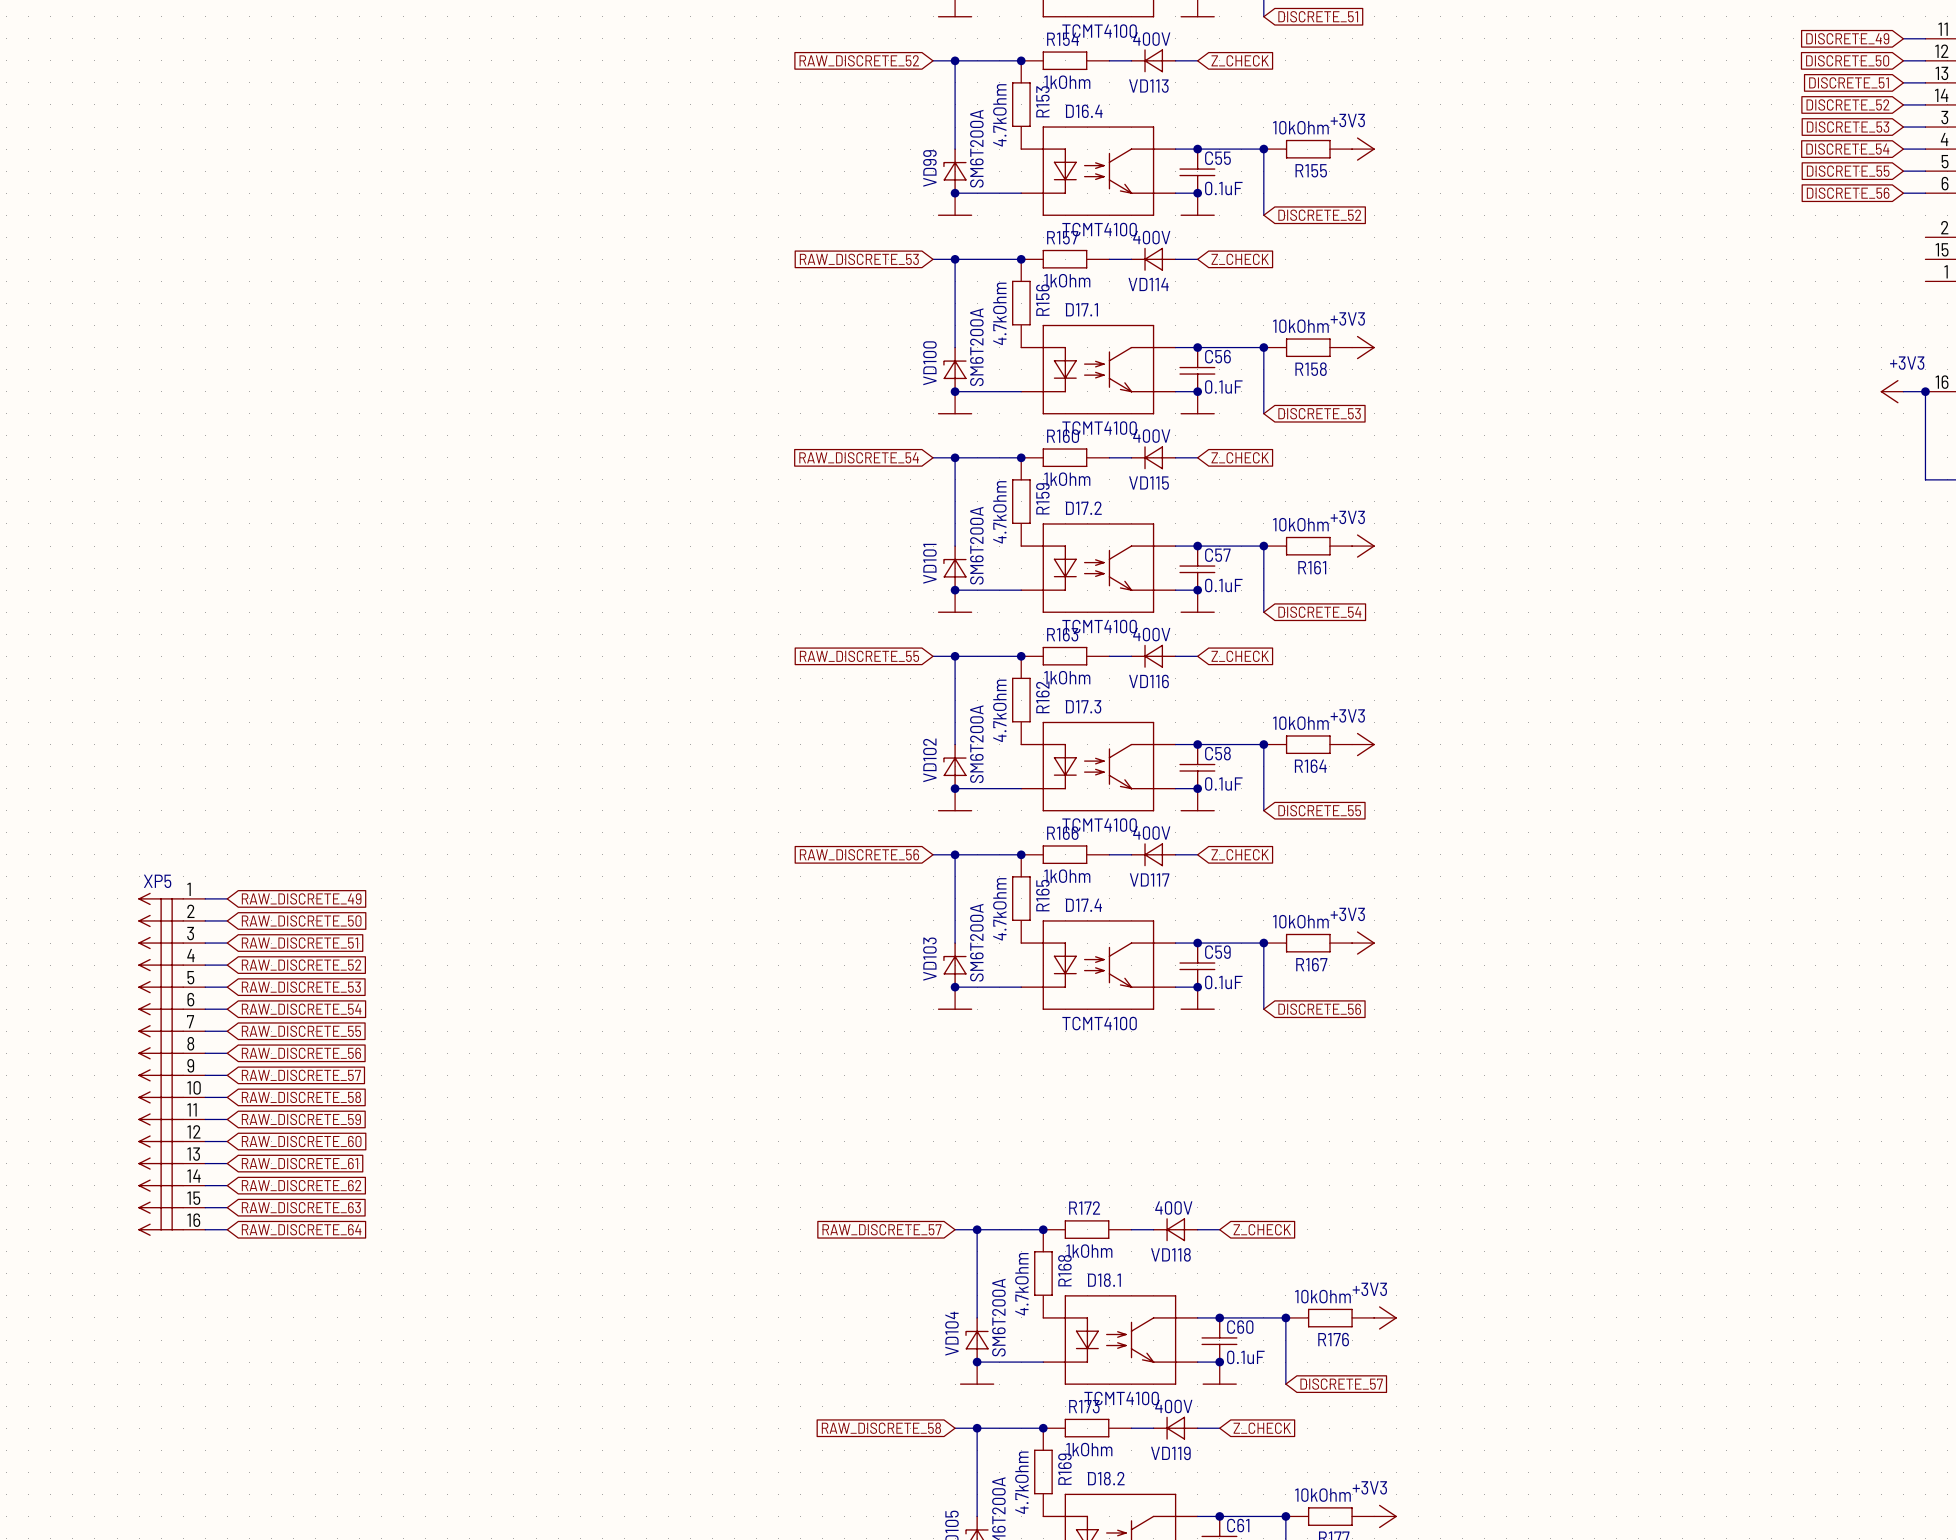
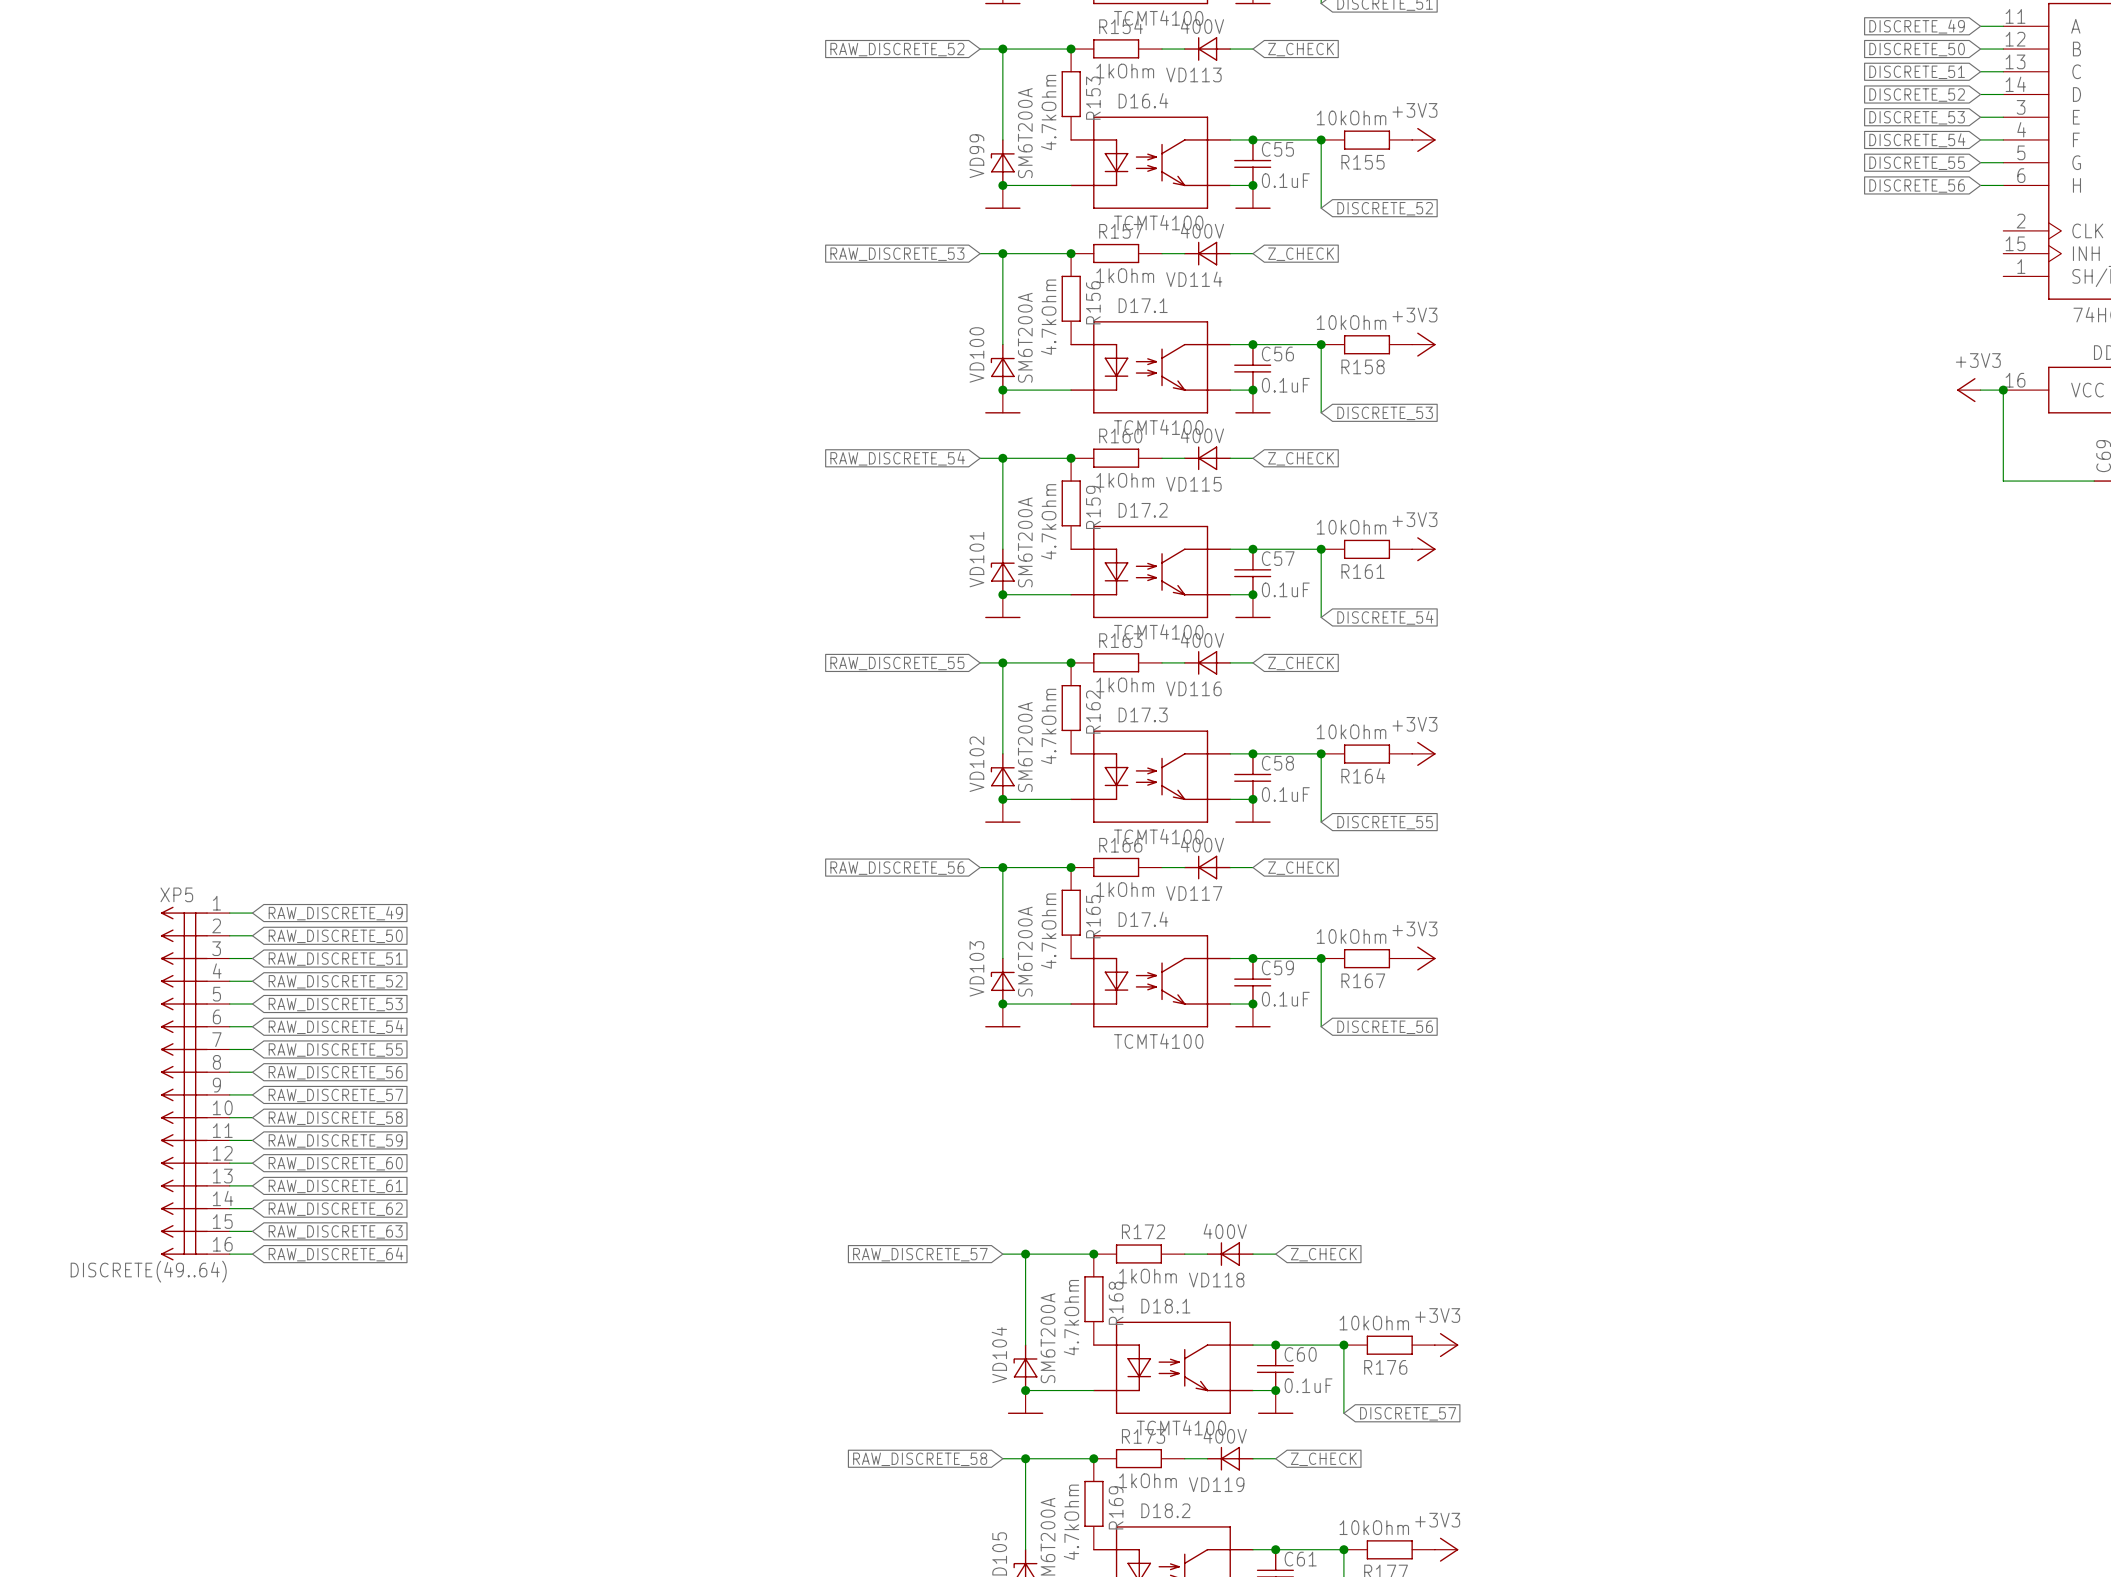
XP5 value: none -> DISCRETE(49..64) (148, 1271)

